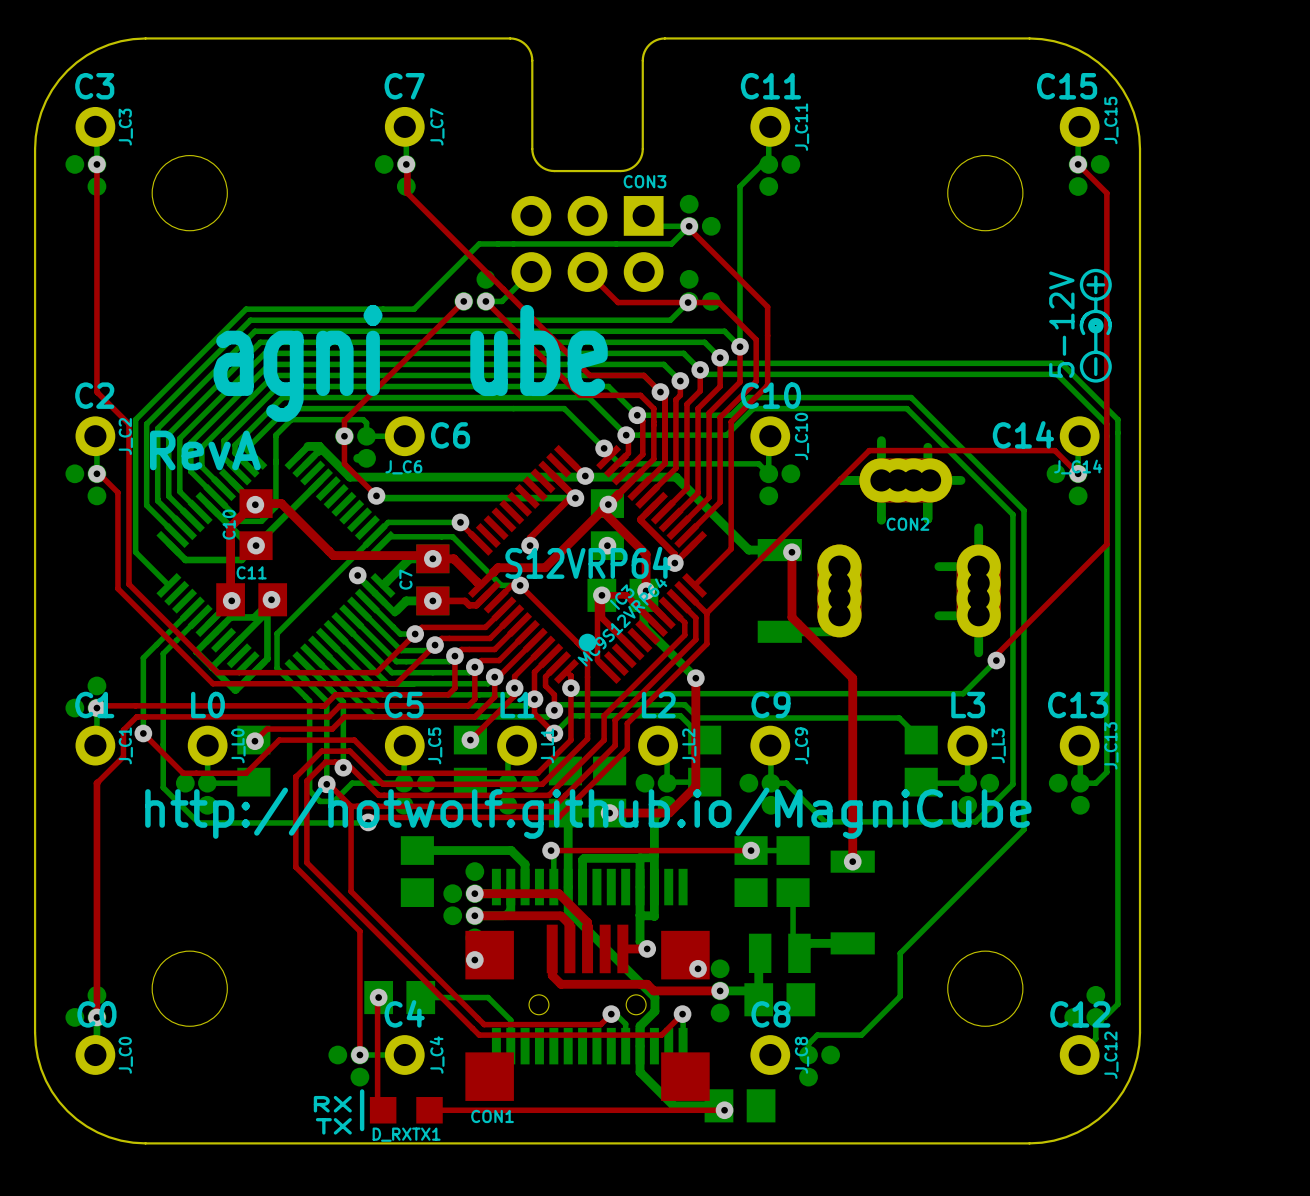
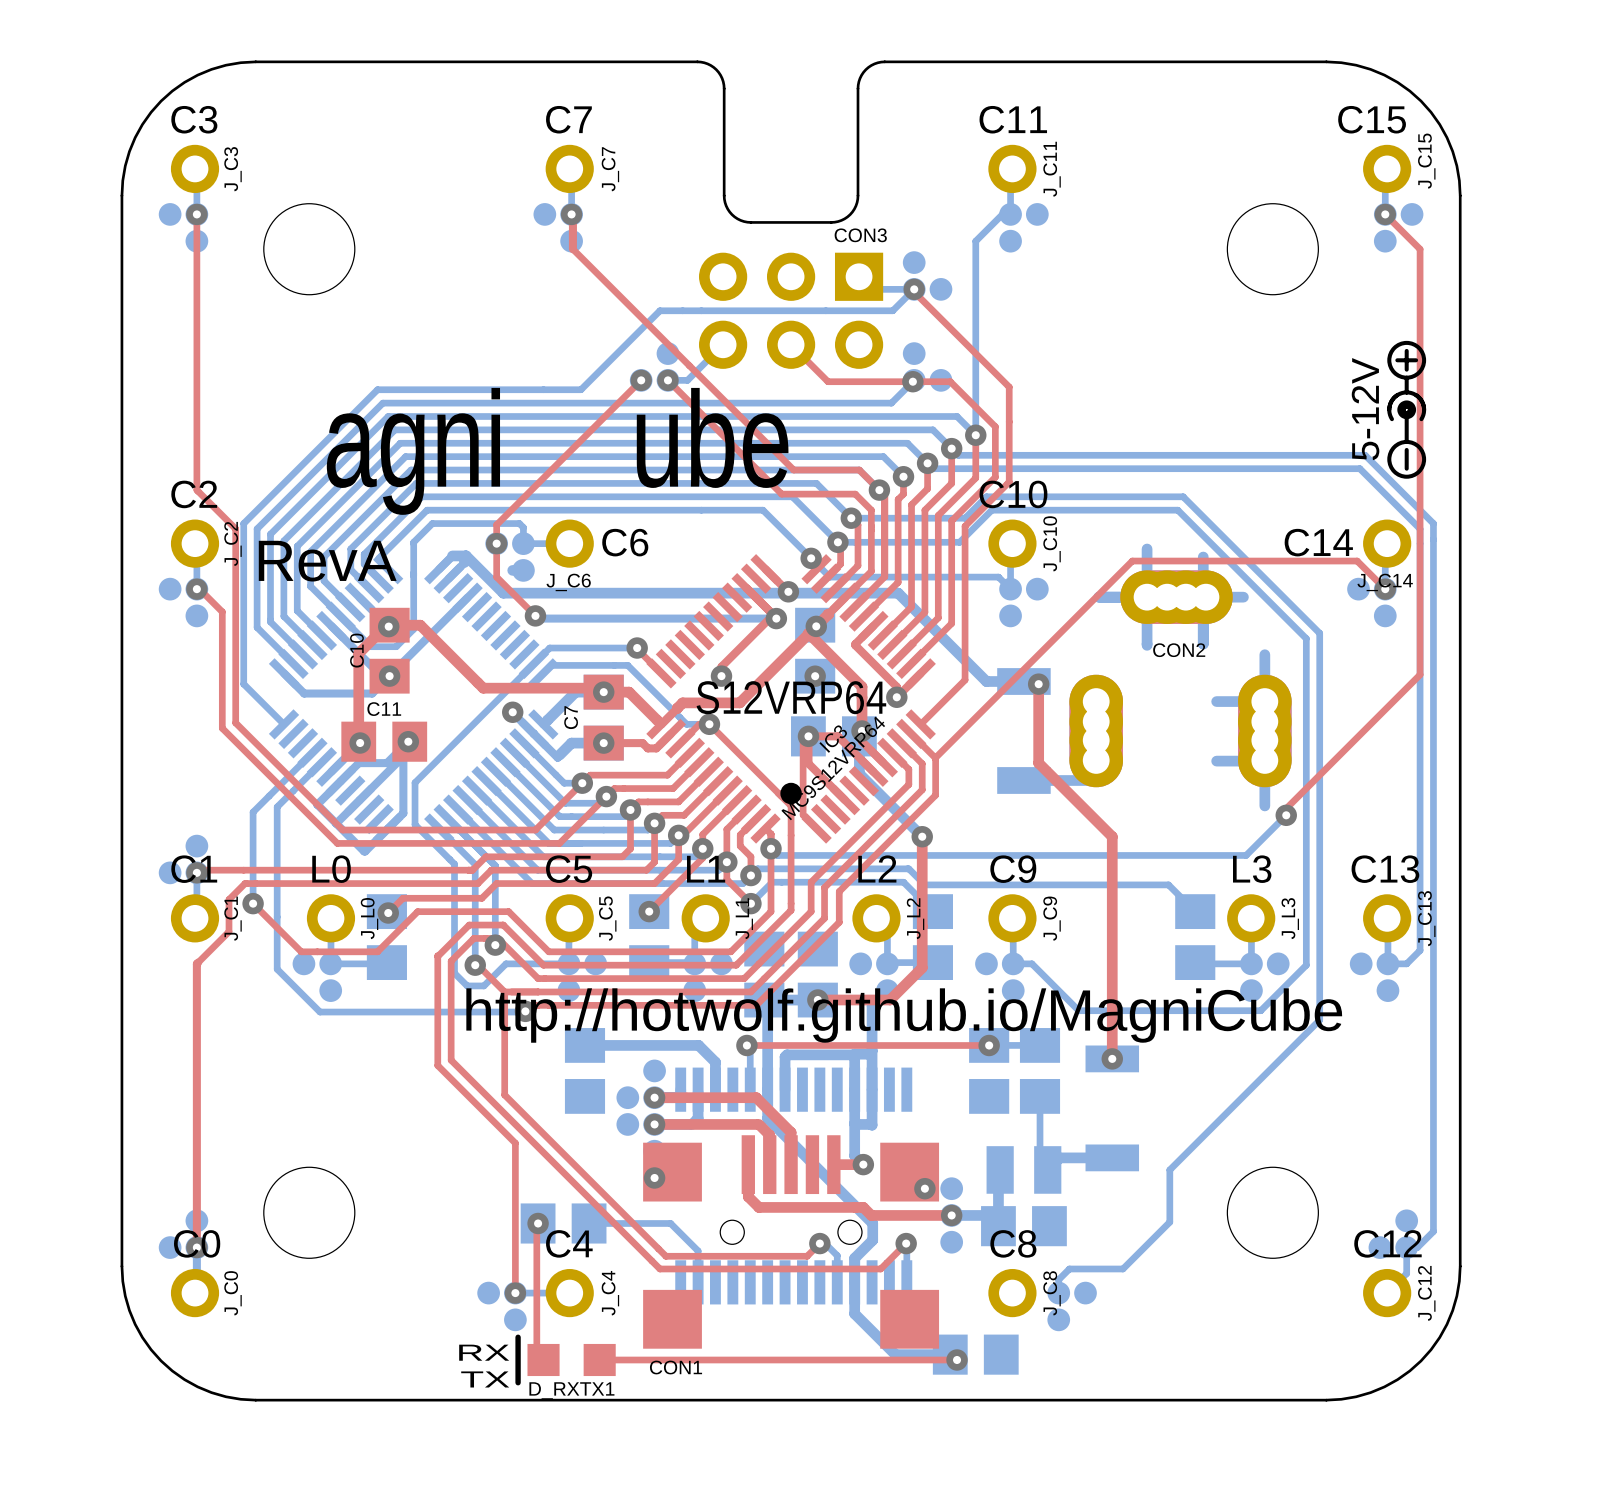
text position: http://hotwolf.github.io/MagniCube (588, 813) -> http://hotwolf.github.io/MagniCube (904, 1015)

